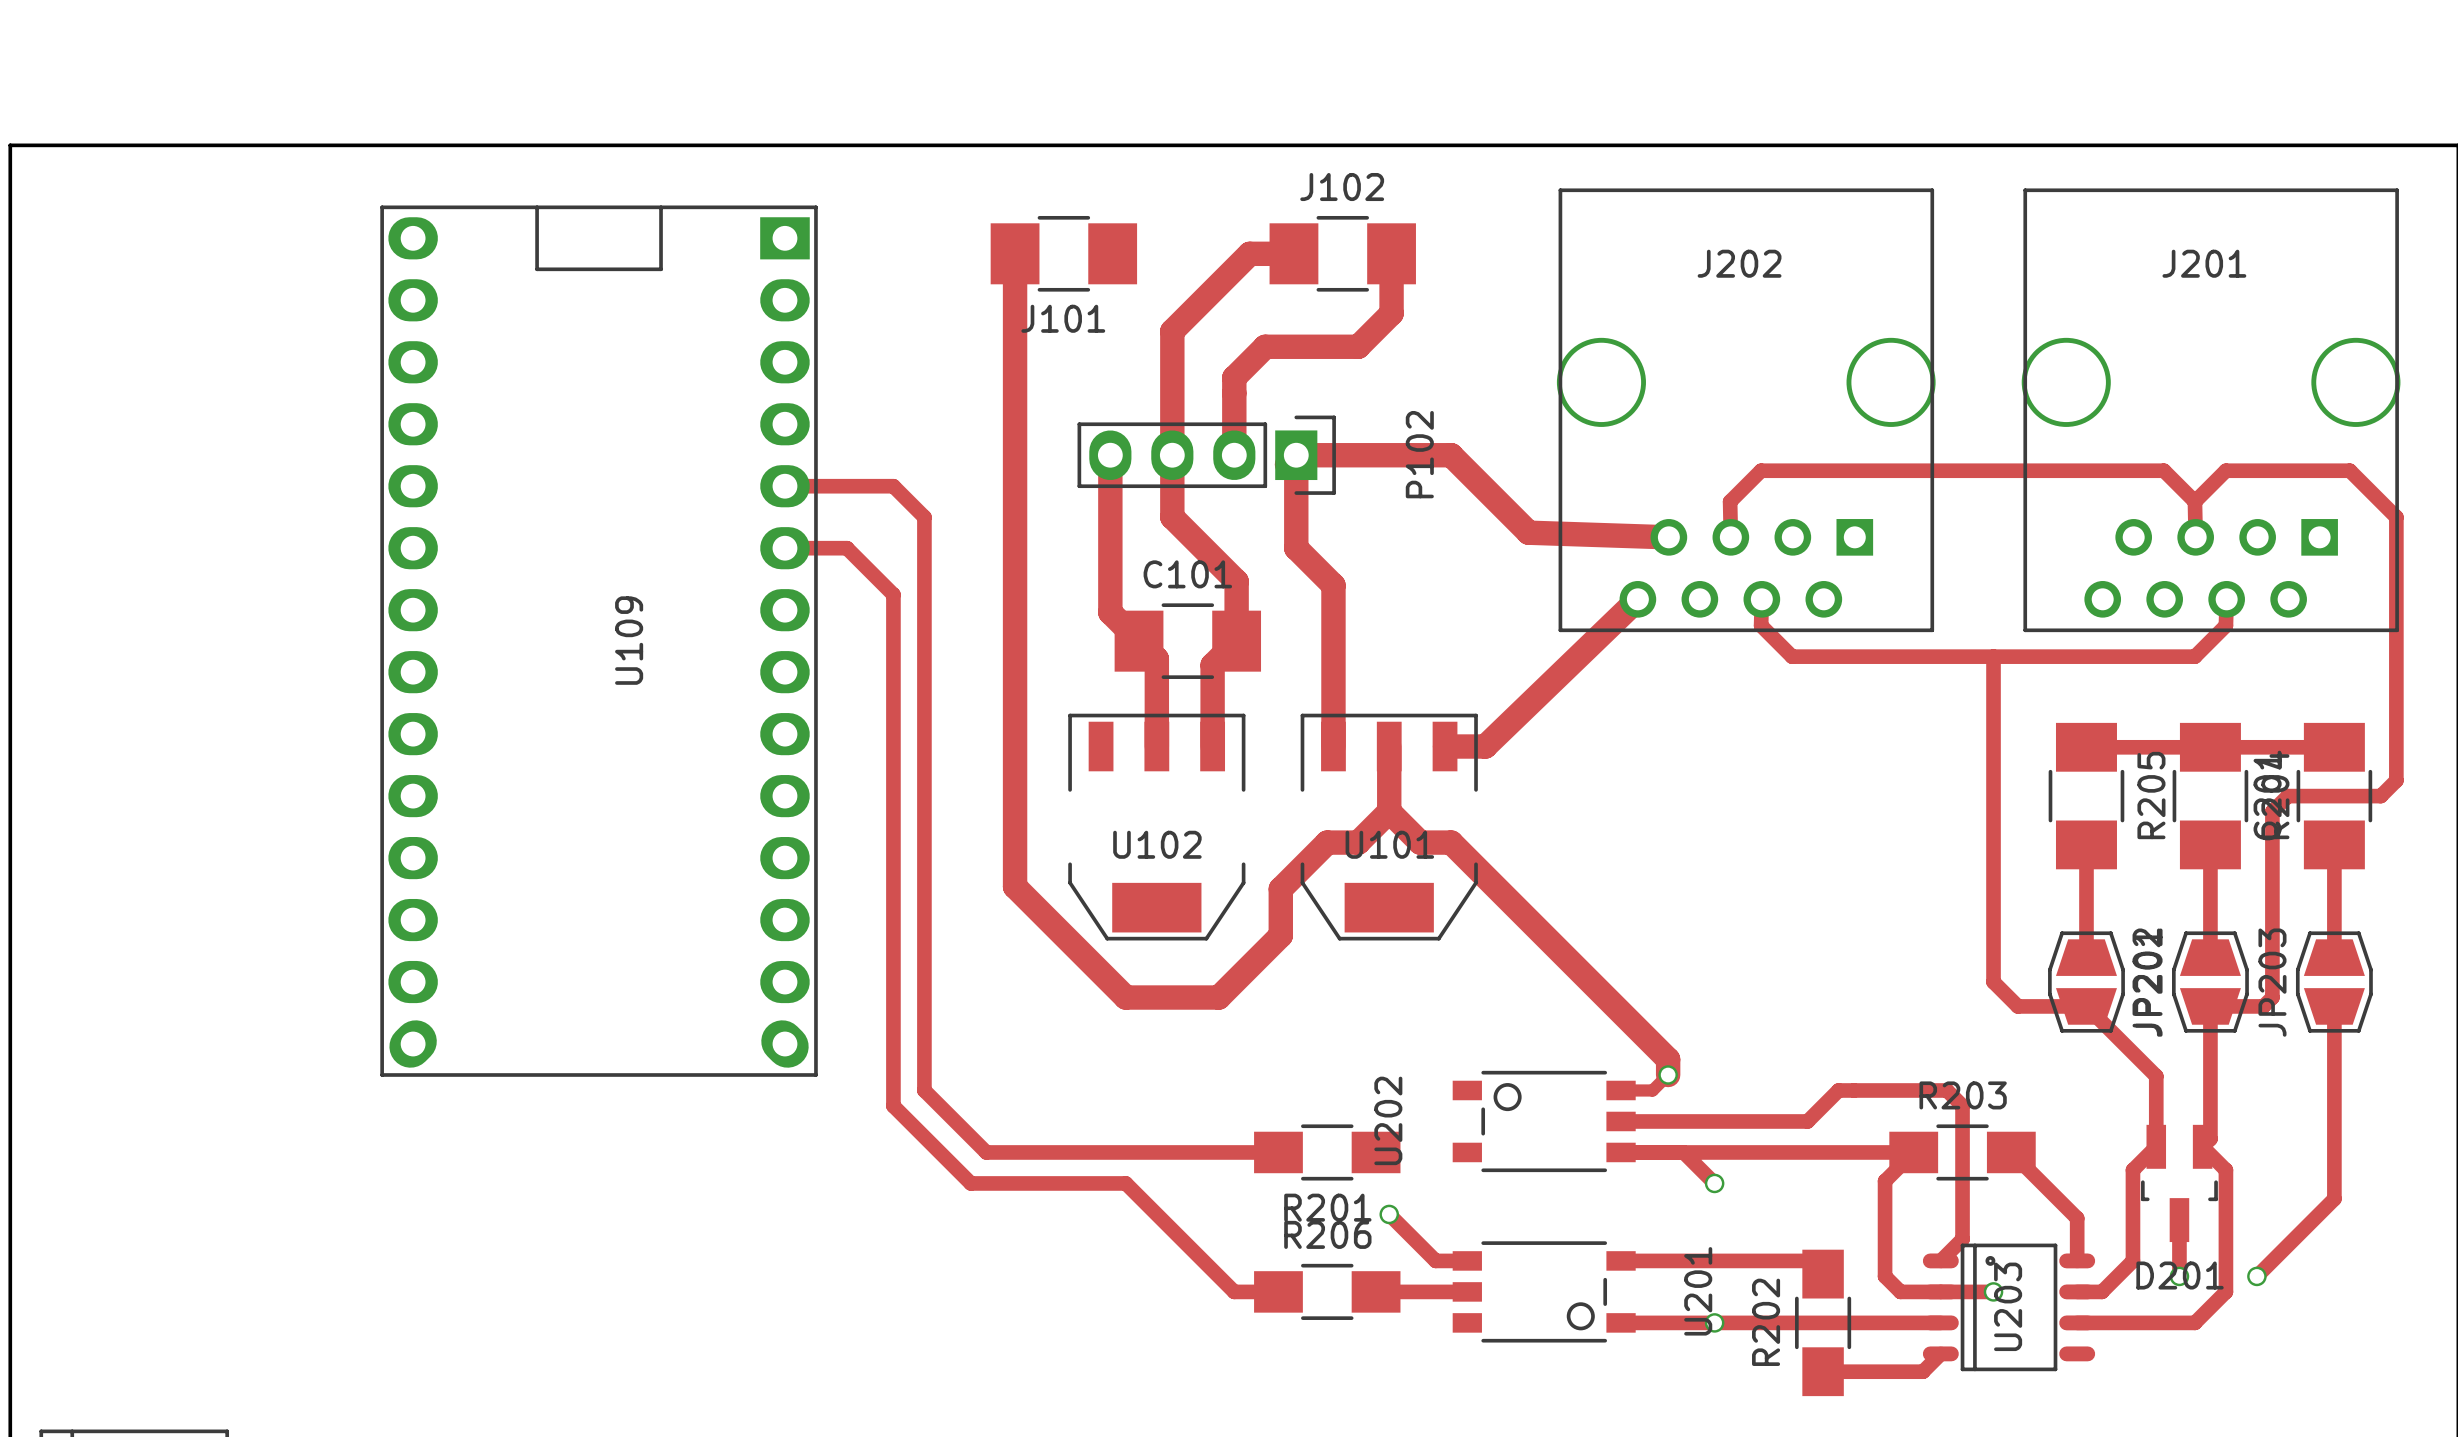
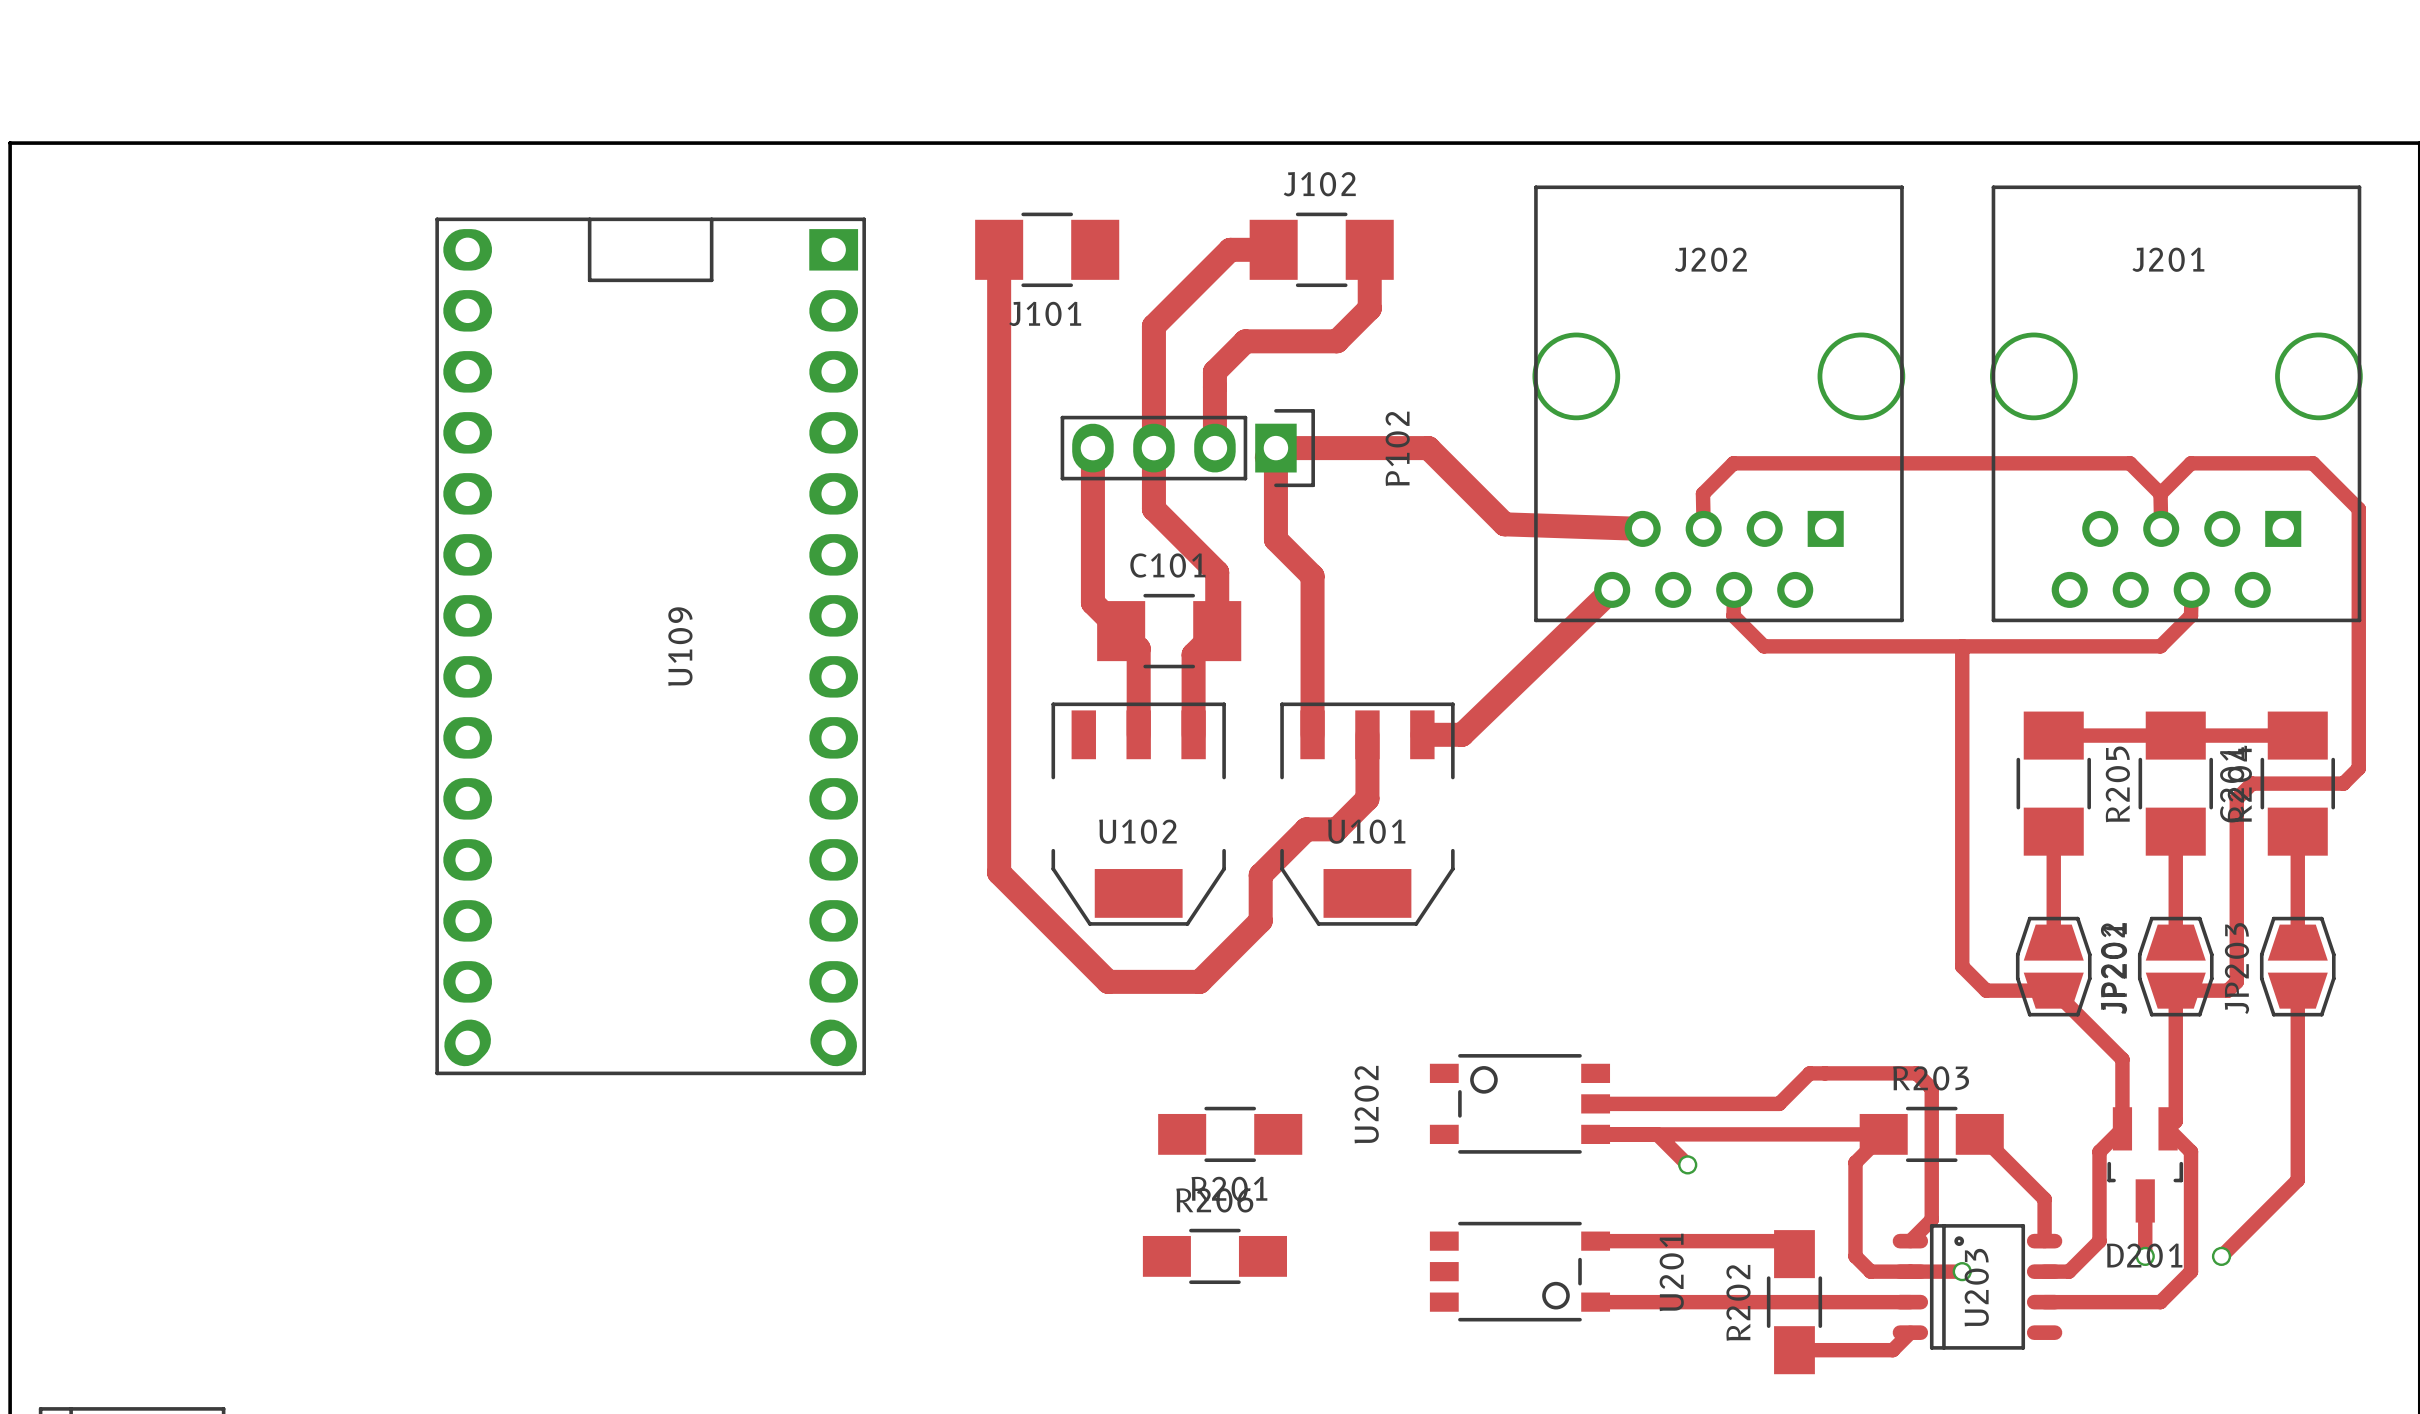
track: (784, 486) (893, 486) (924, 517) (924, 1090) (986, 1152) (1278, 1152) -> none
track: (784, 548) (846, 548) (893, 594) (893, 1105) (970, 1183) (1125, 1183) (1234, 1291) (1278, 1291) -> none
U109 position: (599, 641) -> (650, 646)
track: (1389, 811) (1420, 842) (1451, 842) (1668, 1059) (1668, 1074) (1652, 1090) (1621, 1090) -> none
via: (1668, 1074) -> none
R201 position: (1327, 1152) -> (1230, 1134)
track: (1389, 1214) (1435, 1260) (1467, 1260) -> none
via: (1389, 1214) -> none
R206 position: (1327, 1291) -> (1214, 1256)
track: (1376, 1291) (1467, 1291) -> none
via: (1714, 1322) -> none

